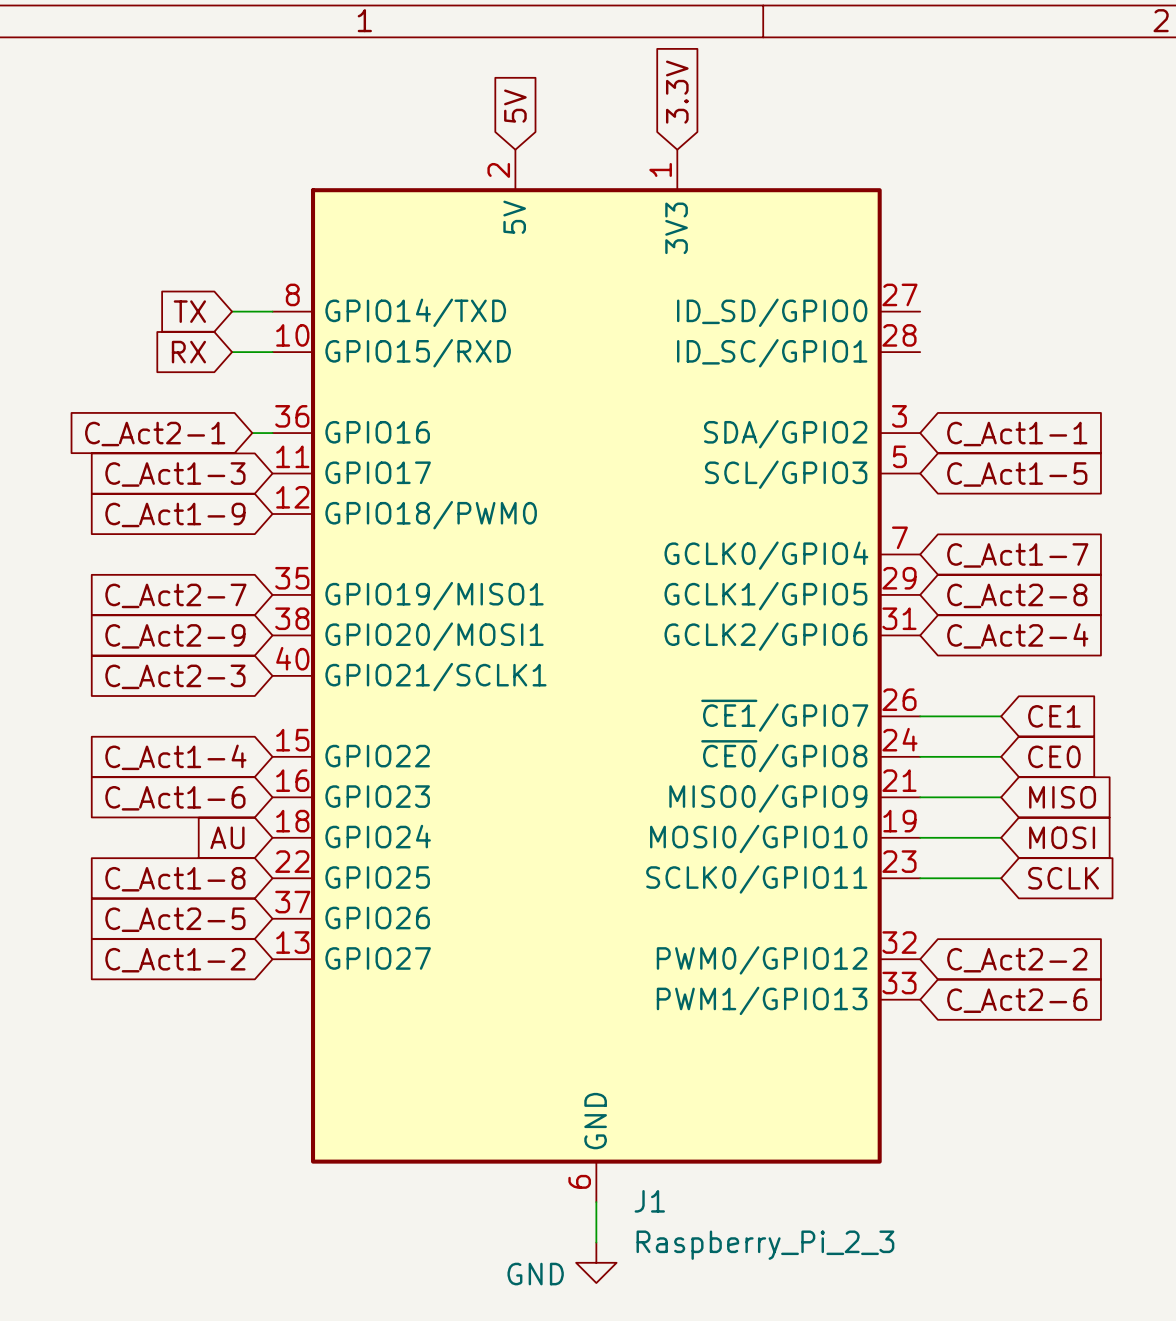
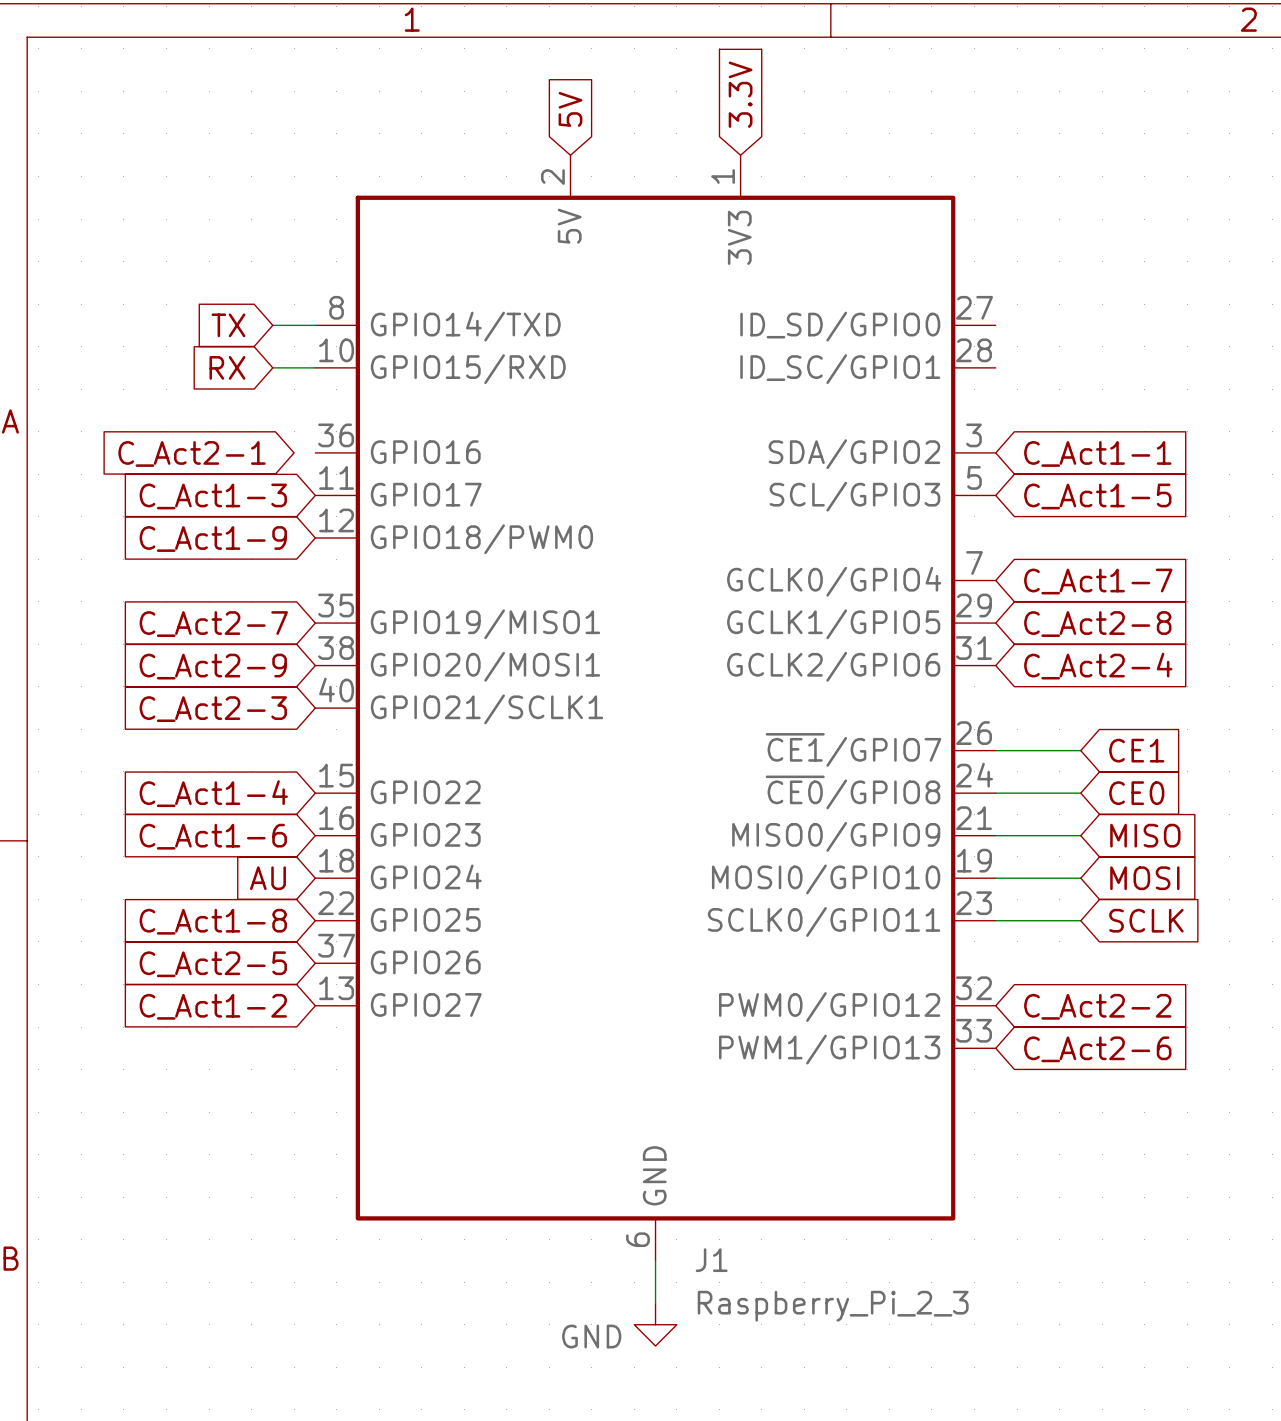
wire: (252, 433) (272, 433) -> none

